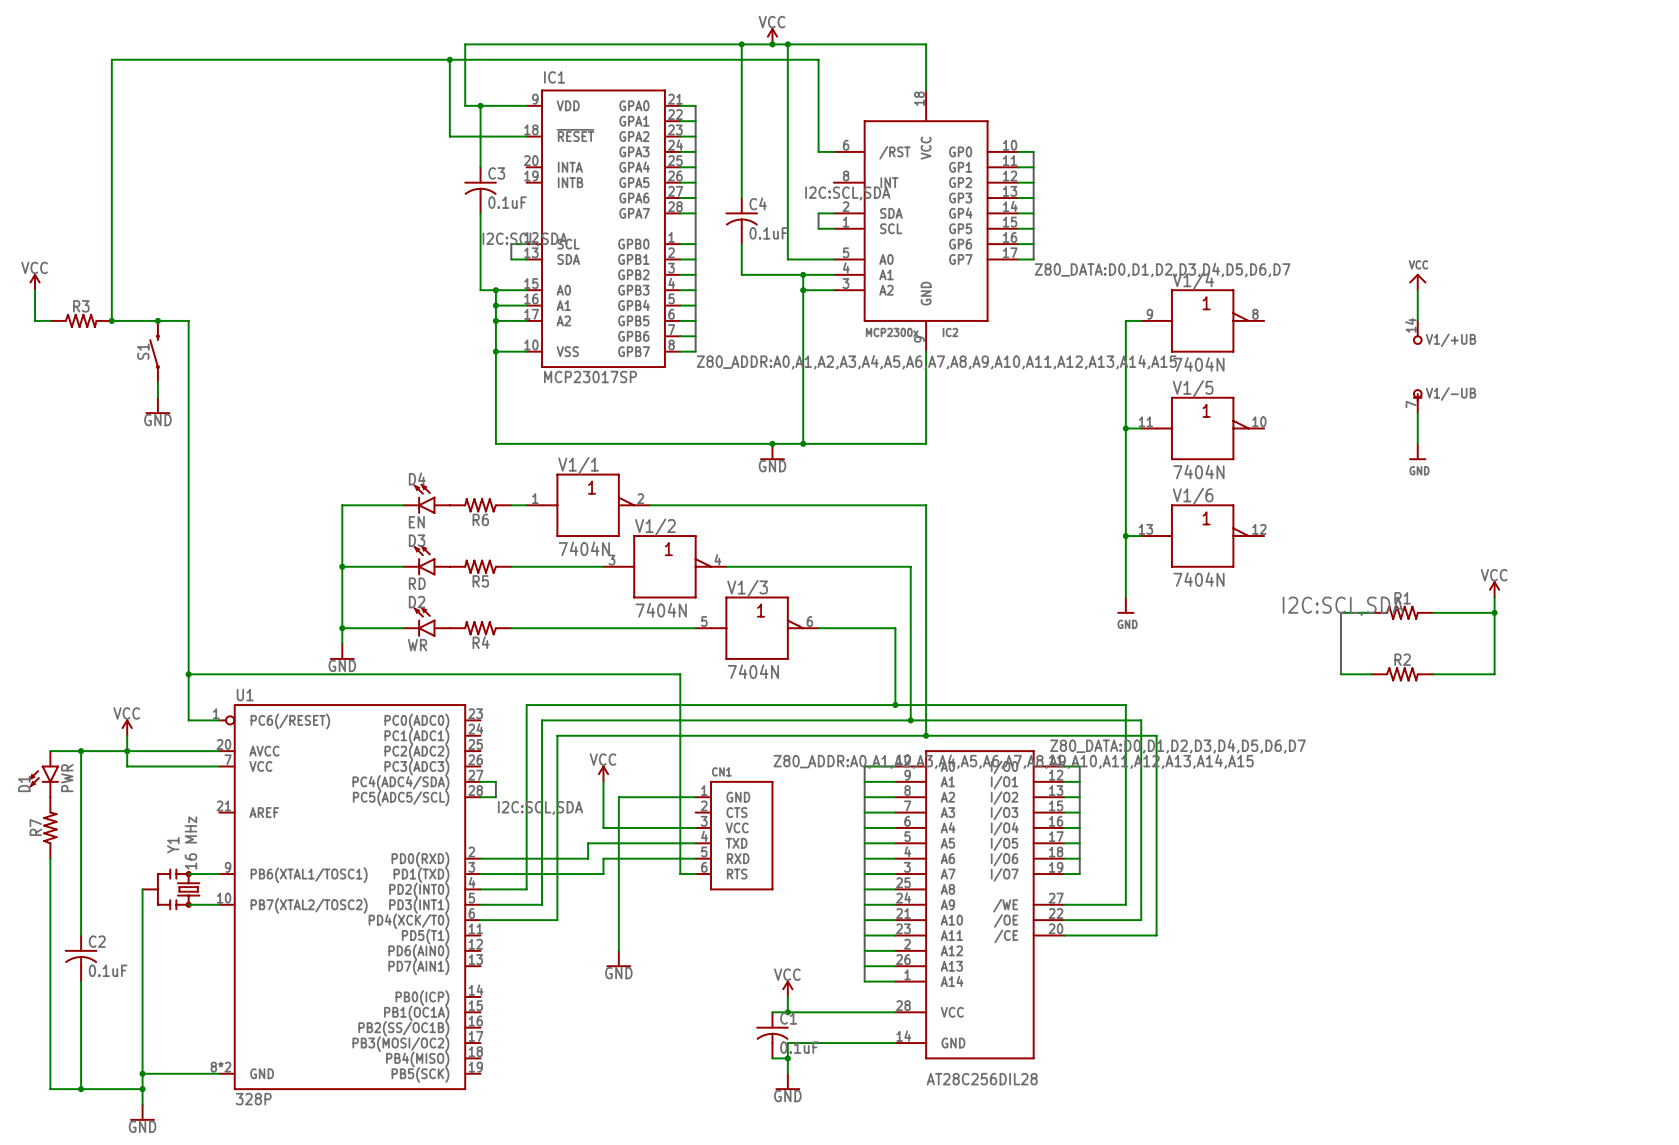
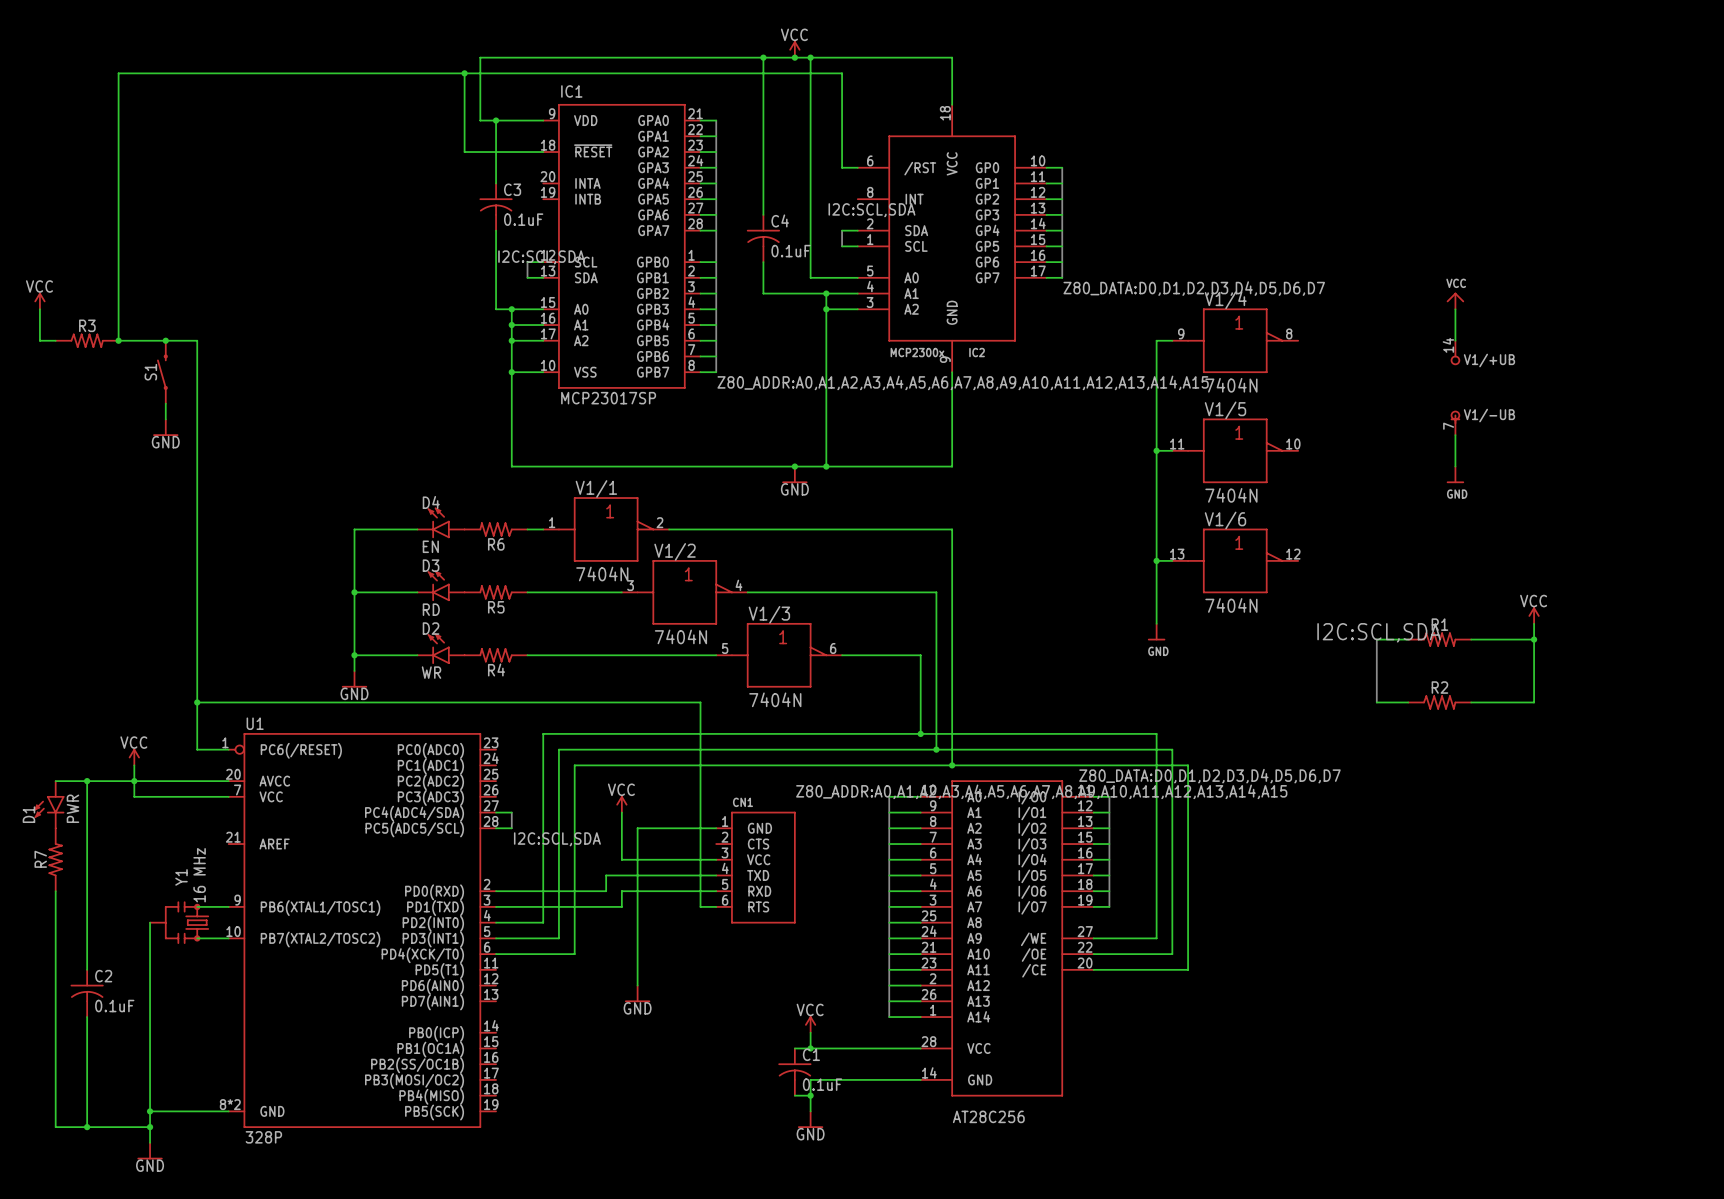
part value: AT28C256DIL28 (982, 1079) -> AT28C256 (988, 1116)

